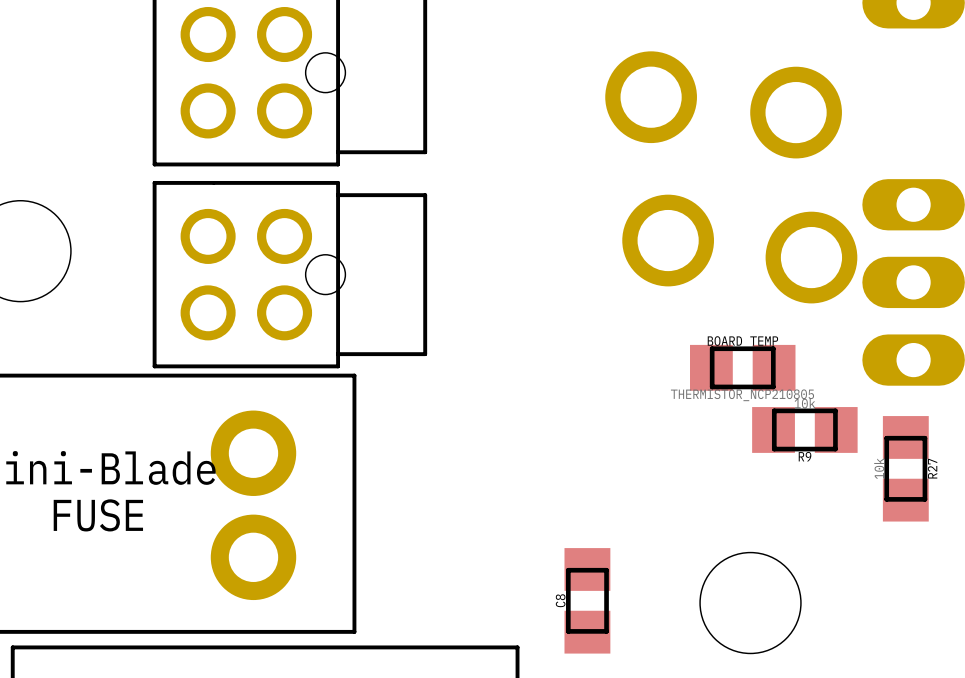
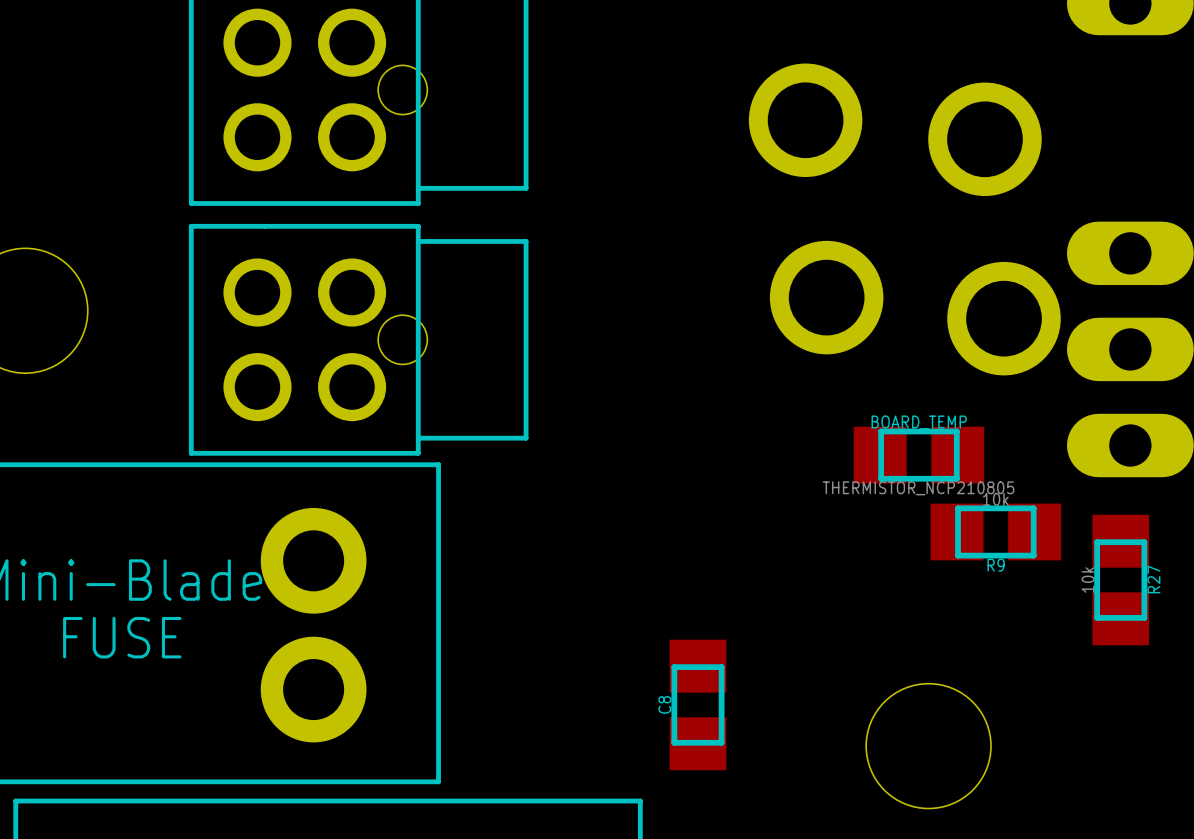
C8 position: (587, 600) -> (697, 704)

